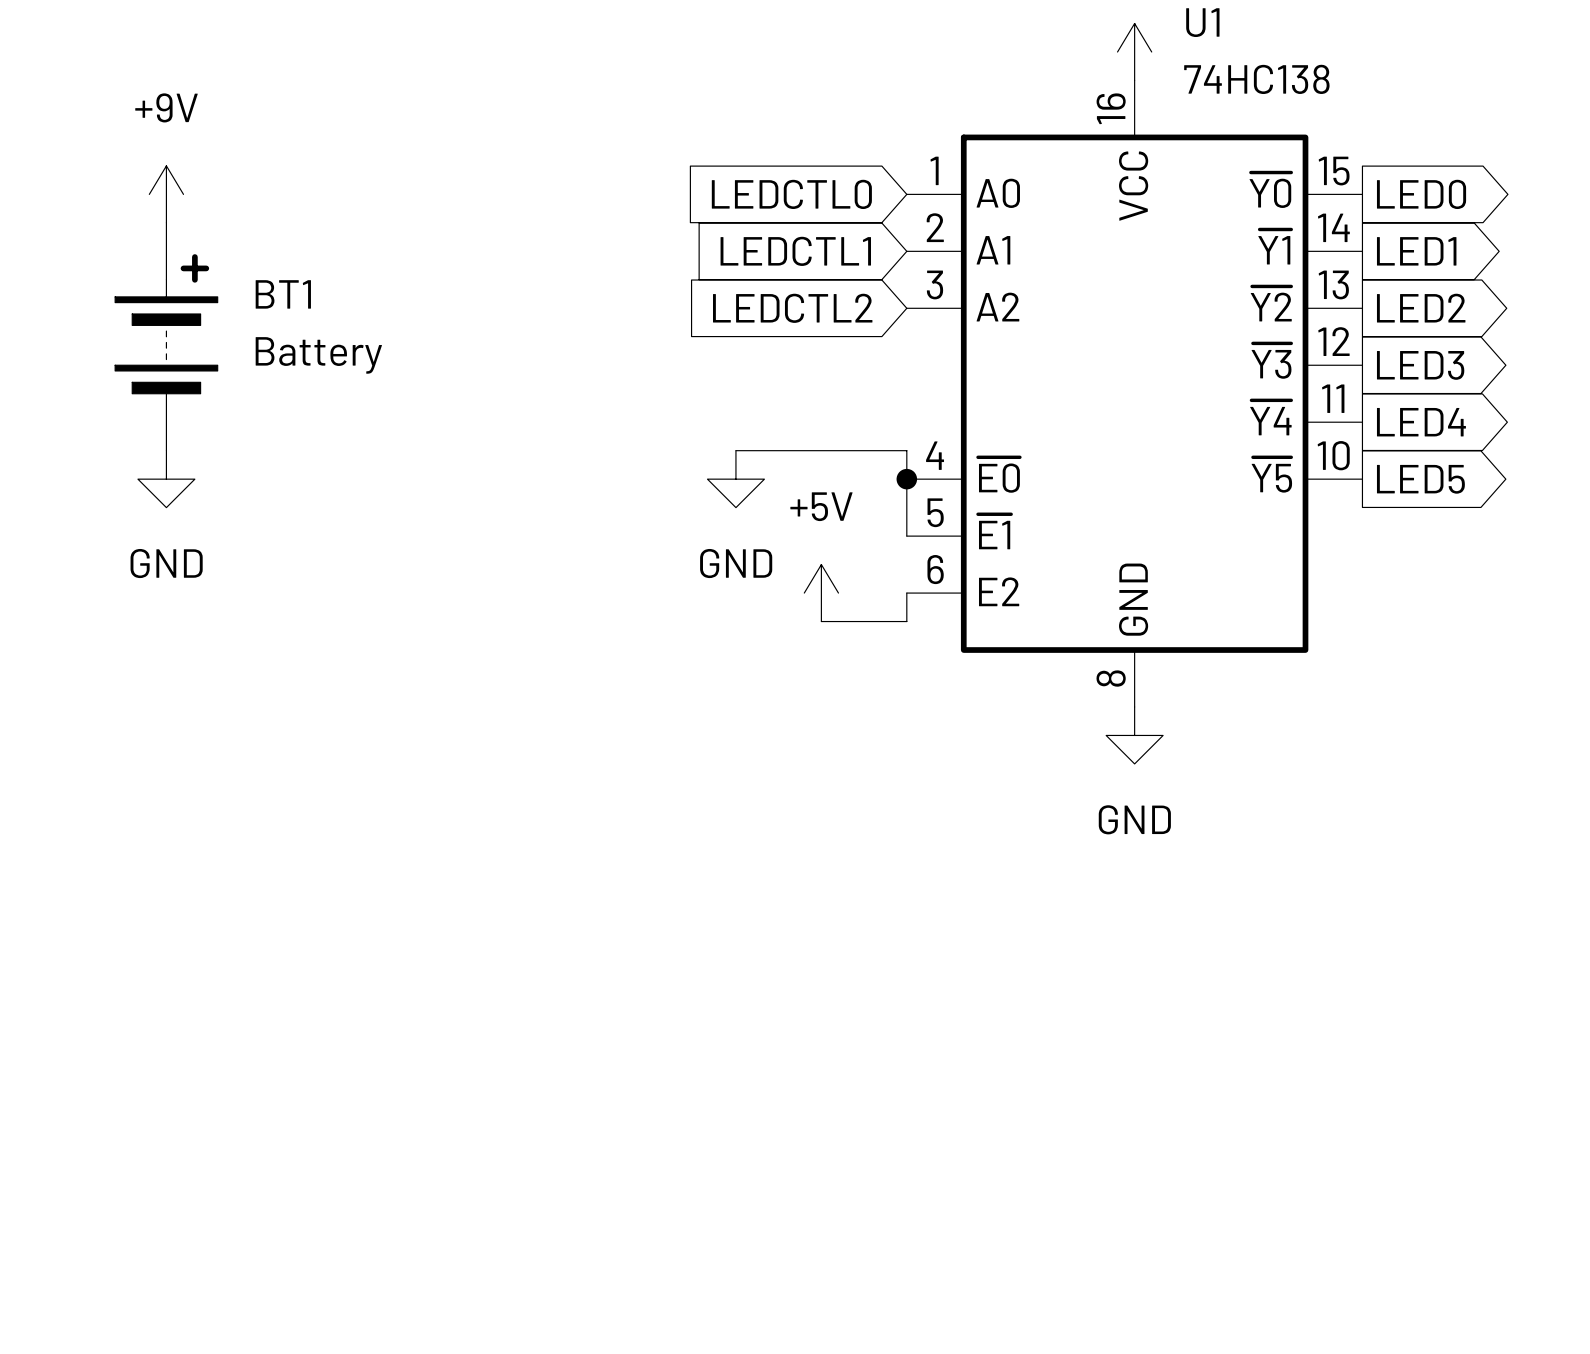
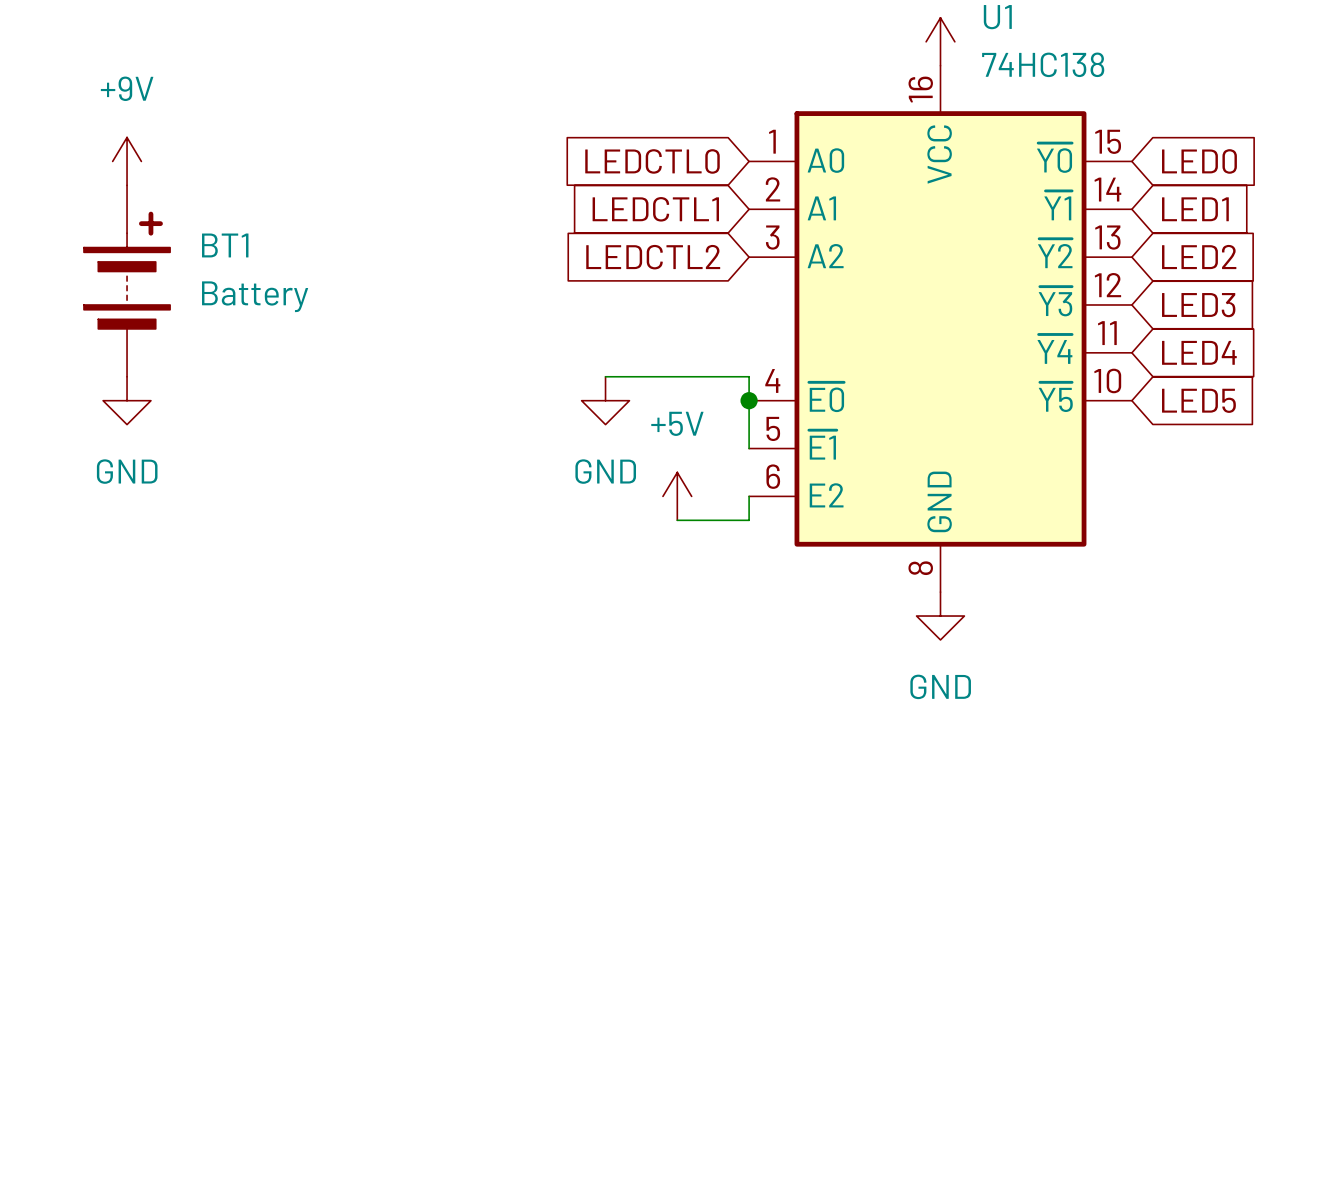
global label shape: output (1421, 194) -> input (1199, 161)
global label shape: output (1416, 251) -> input (1195, 209)
global label shape: output (1421, 308) -> input (1199, 257)
global label shape: output (1420, 365) -> input (1198, 305)
global label shape: output (1421, 422) -> input (1199, 352)
global label shape: output (1420, 479) -> input (1198, 400)

